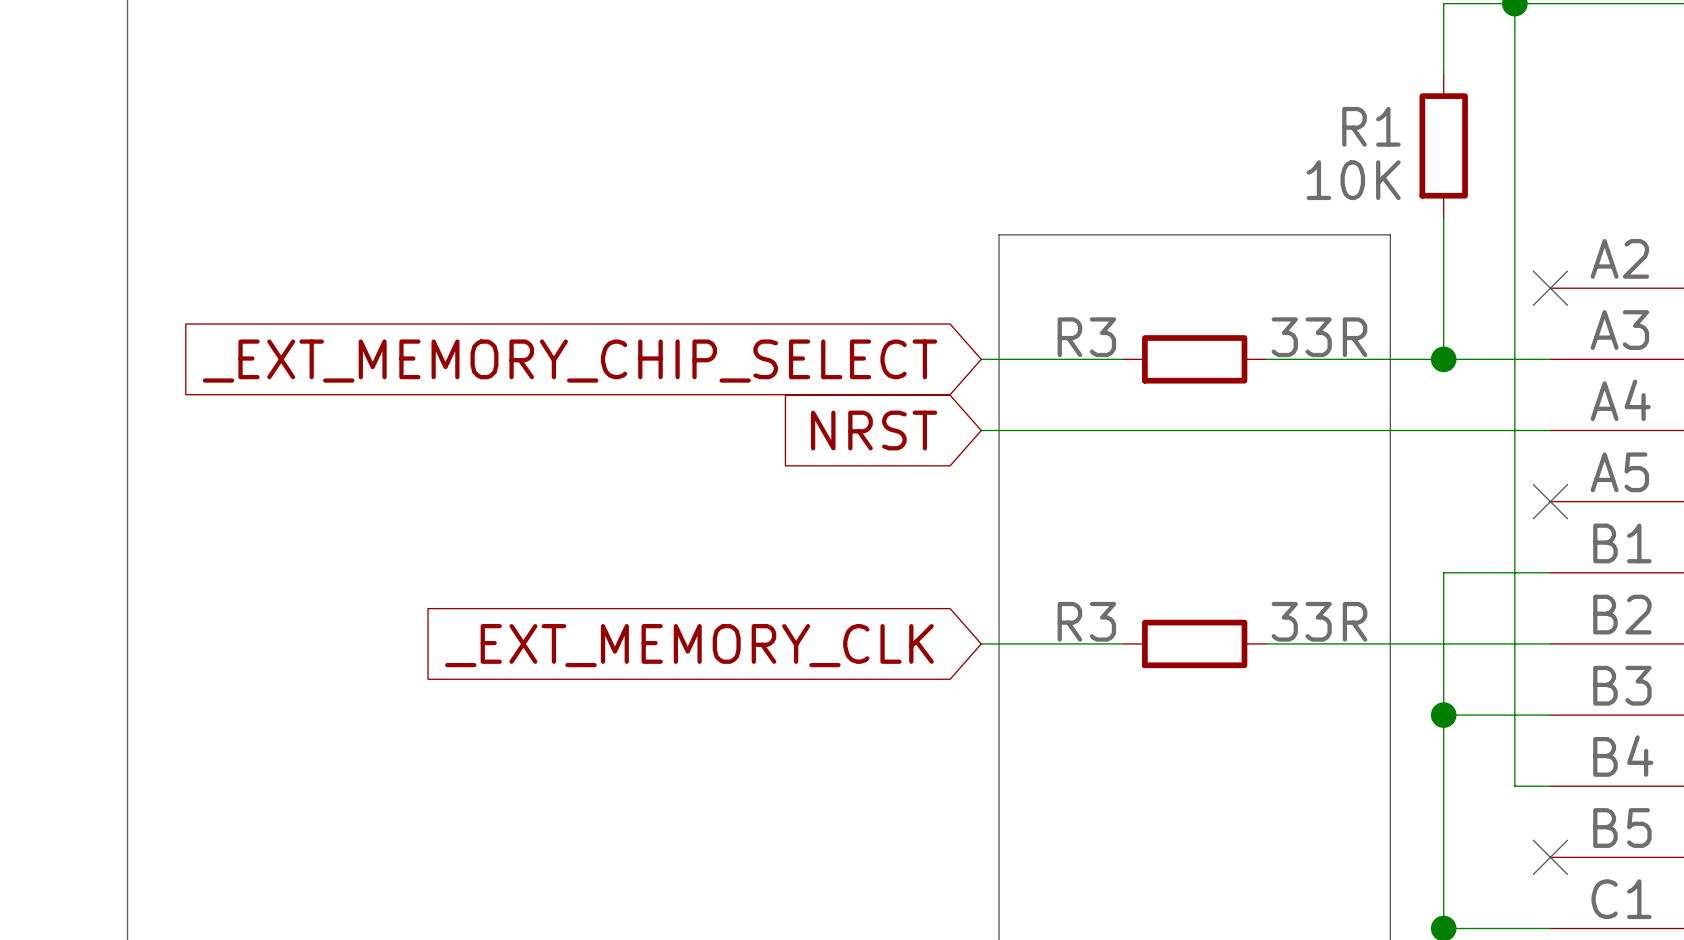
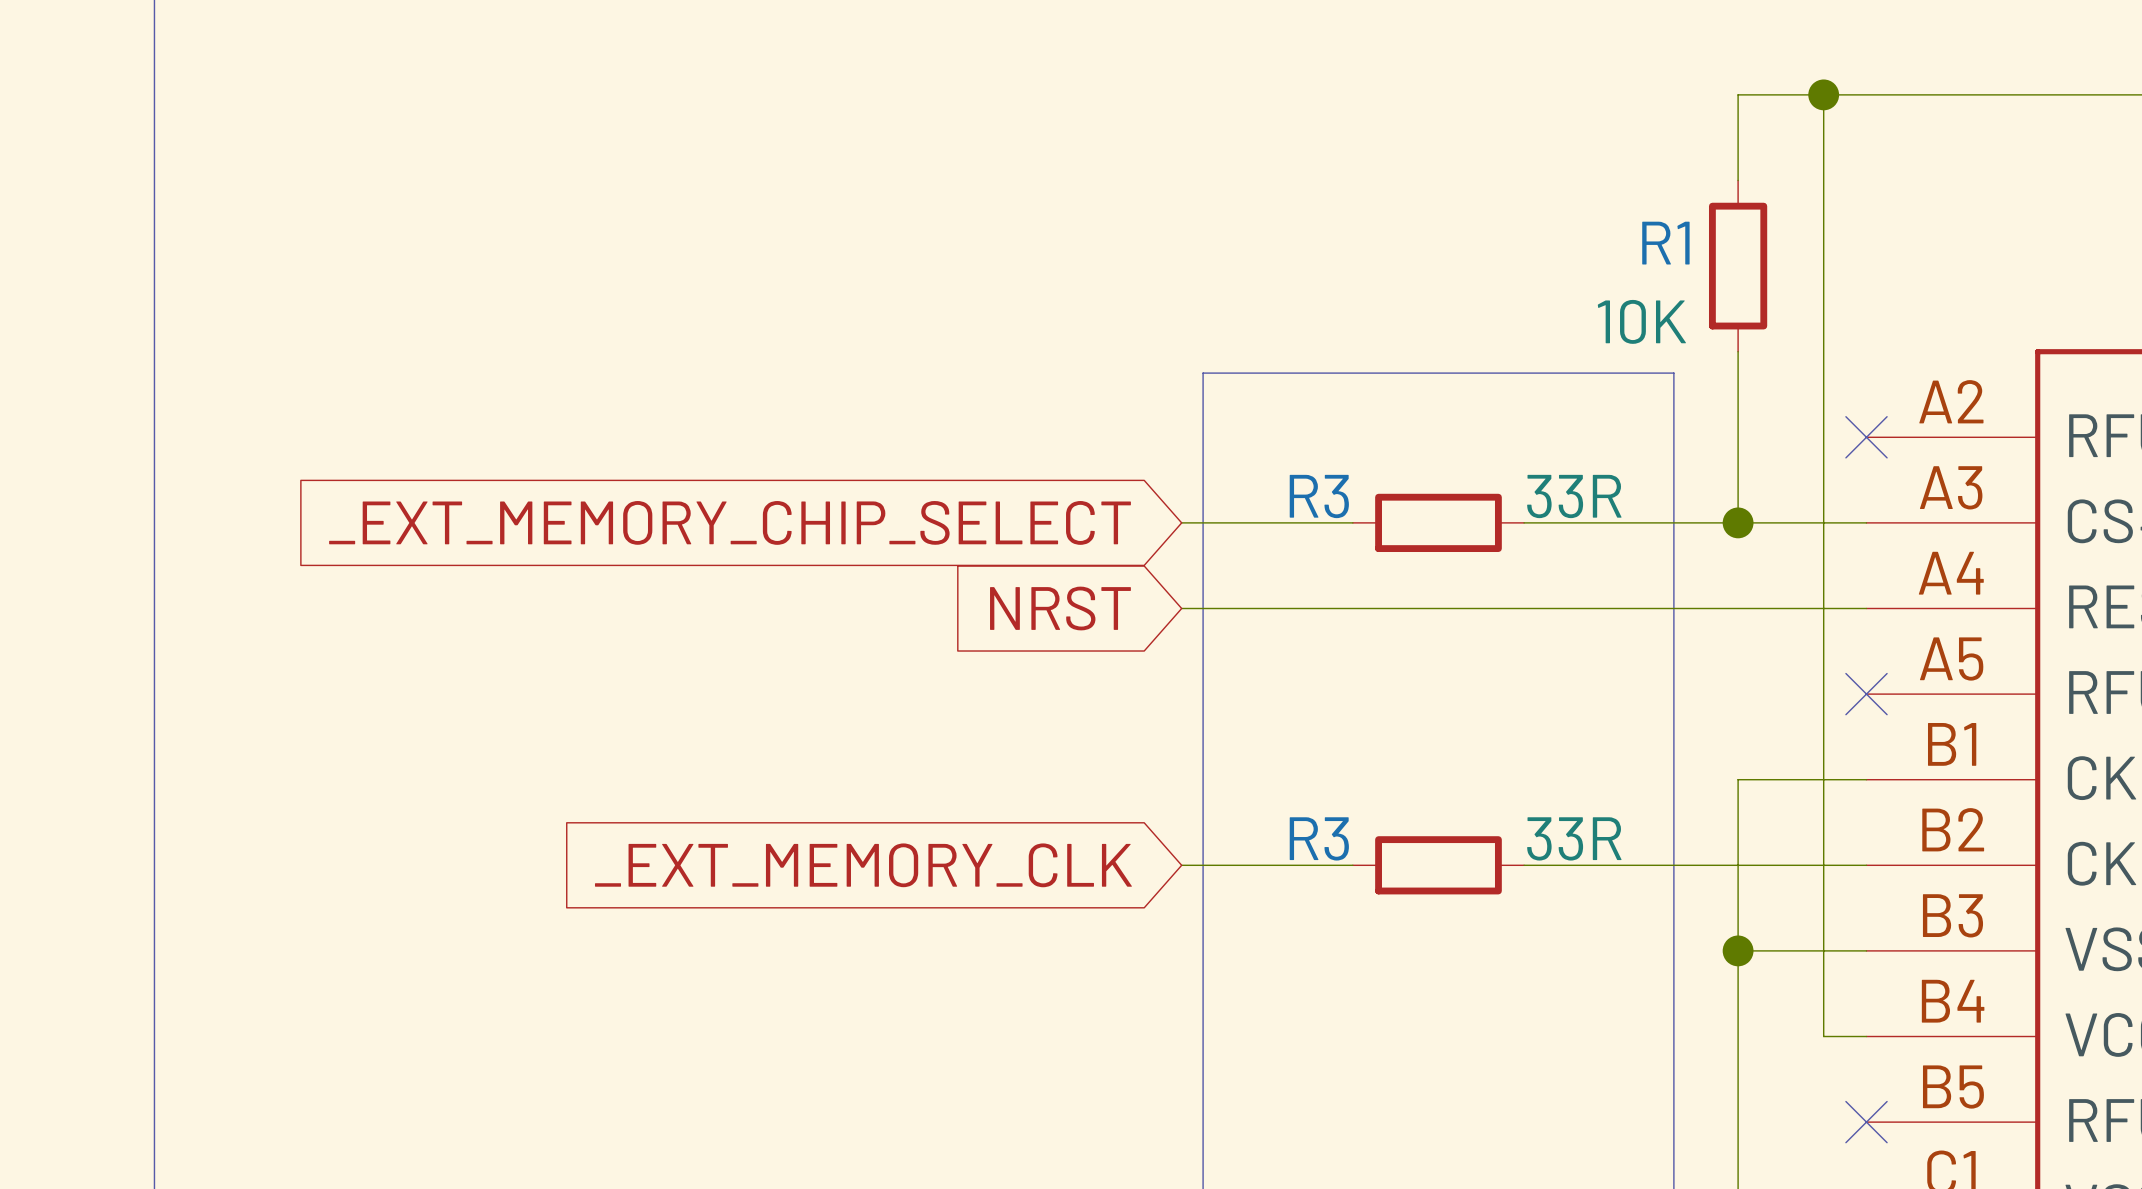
R1 value position: 10K (1353, 180) -> 10K (1641, 321)

